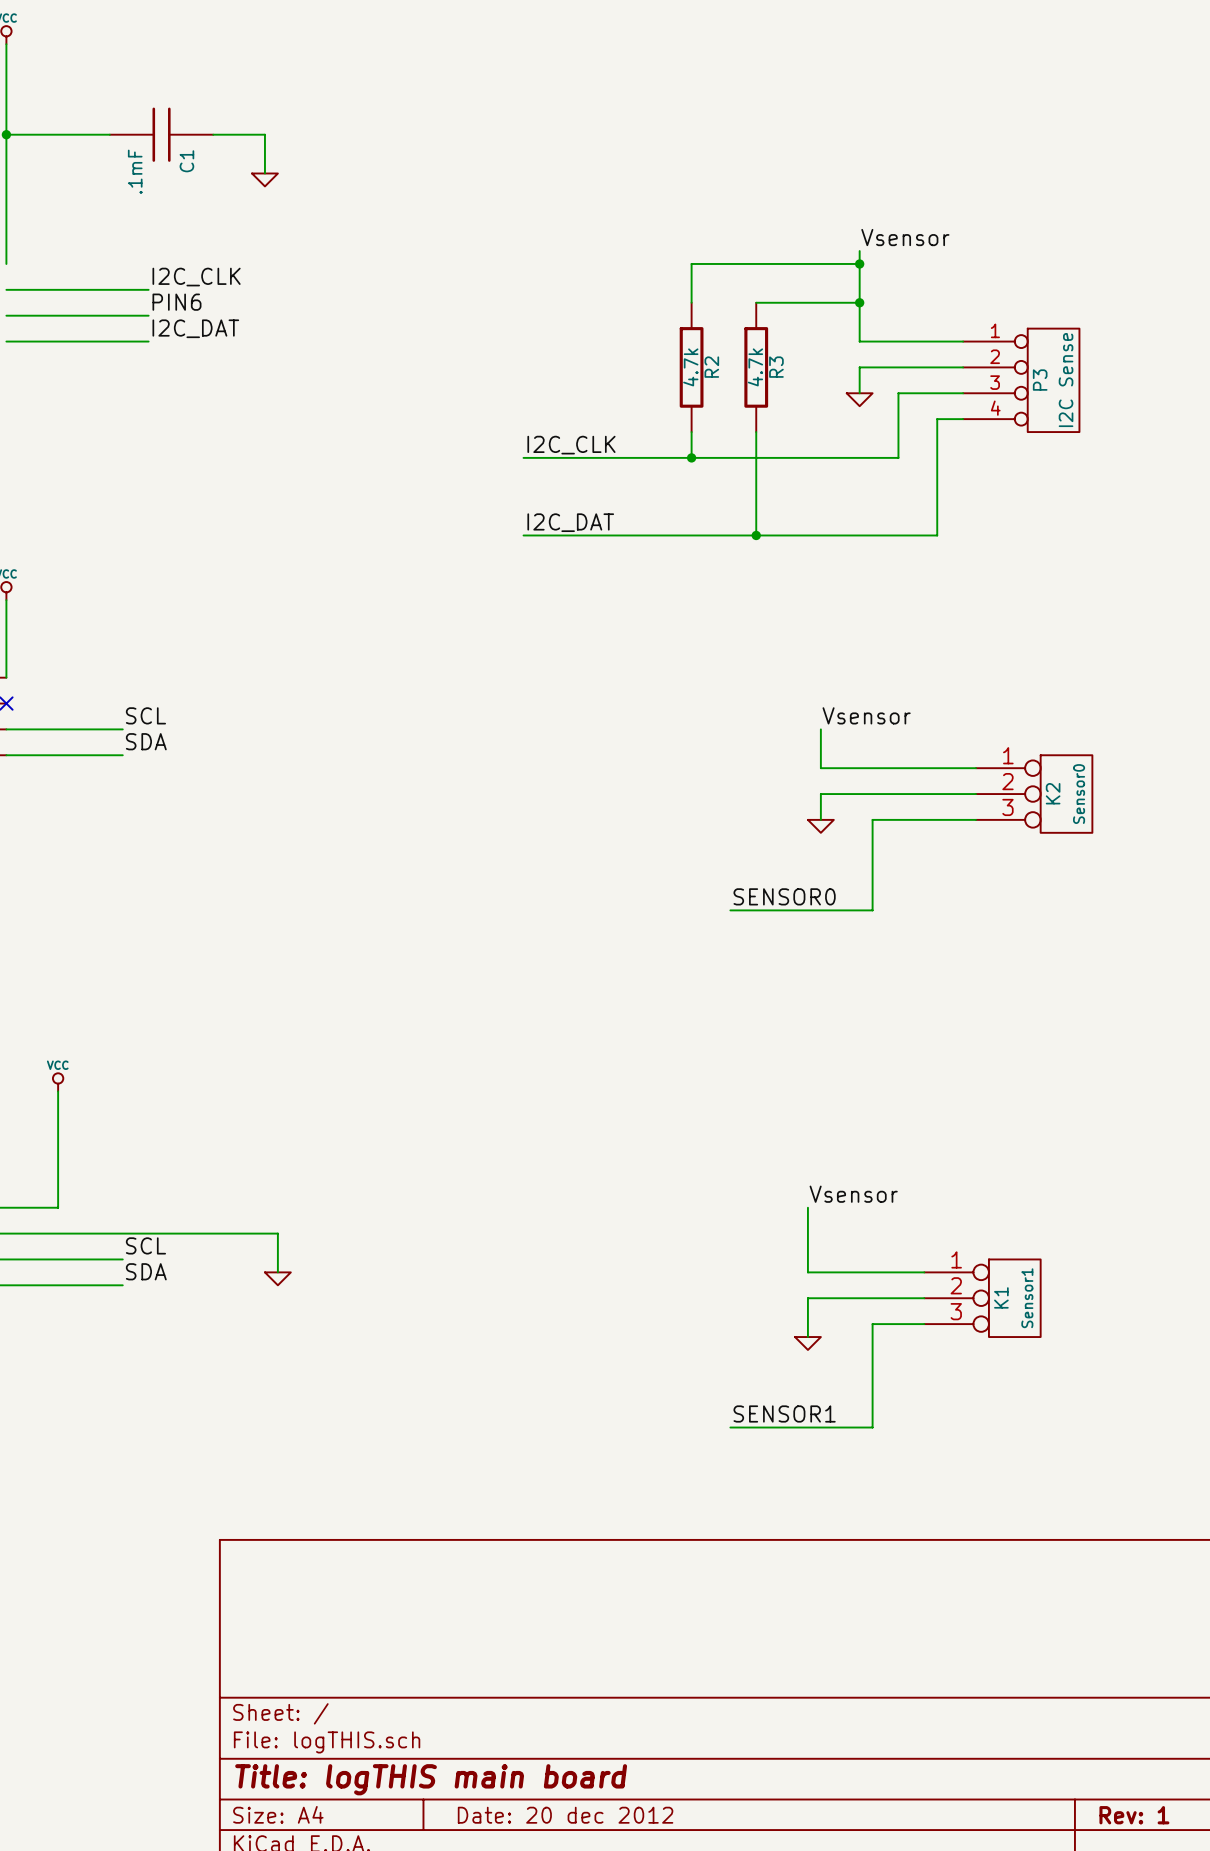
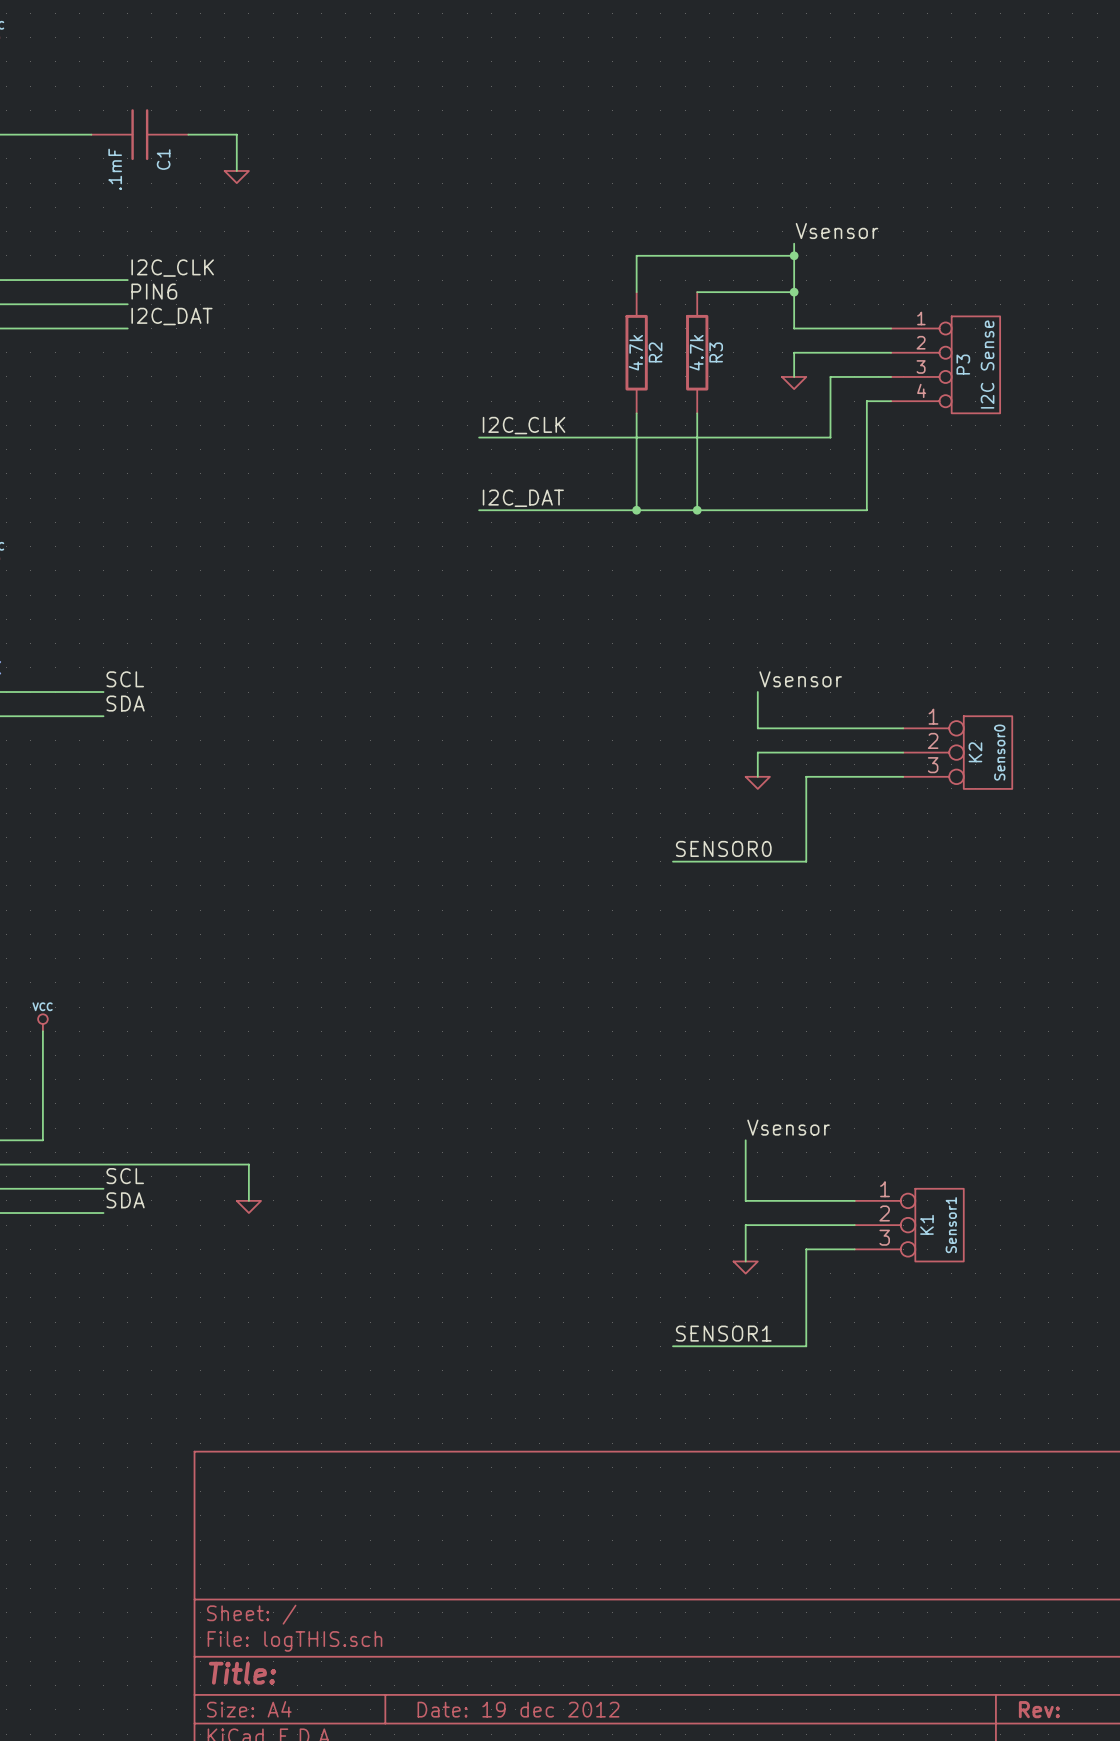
wire: none -> (636, 437) (636, 510)
junction: (691, 457) -> none
junction: none -> (636, 510)
title block: Title: logTHIS main board (431, 1779) -> Title: (242, 1673)
title block: Date: 20 dec 2012 (565, 1815) -> Date: 19 dec 2012 (518, 1709)
title block: Rev: 1 (1134, 1815) -> Rev: (1039, 1709)

